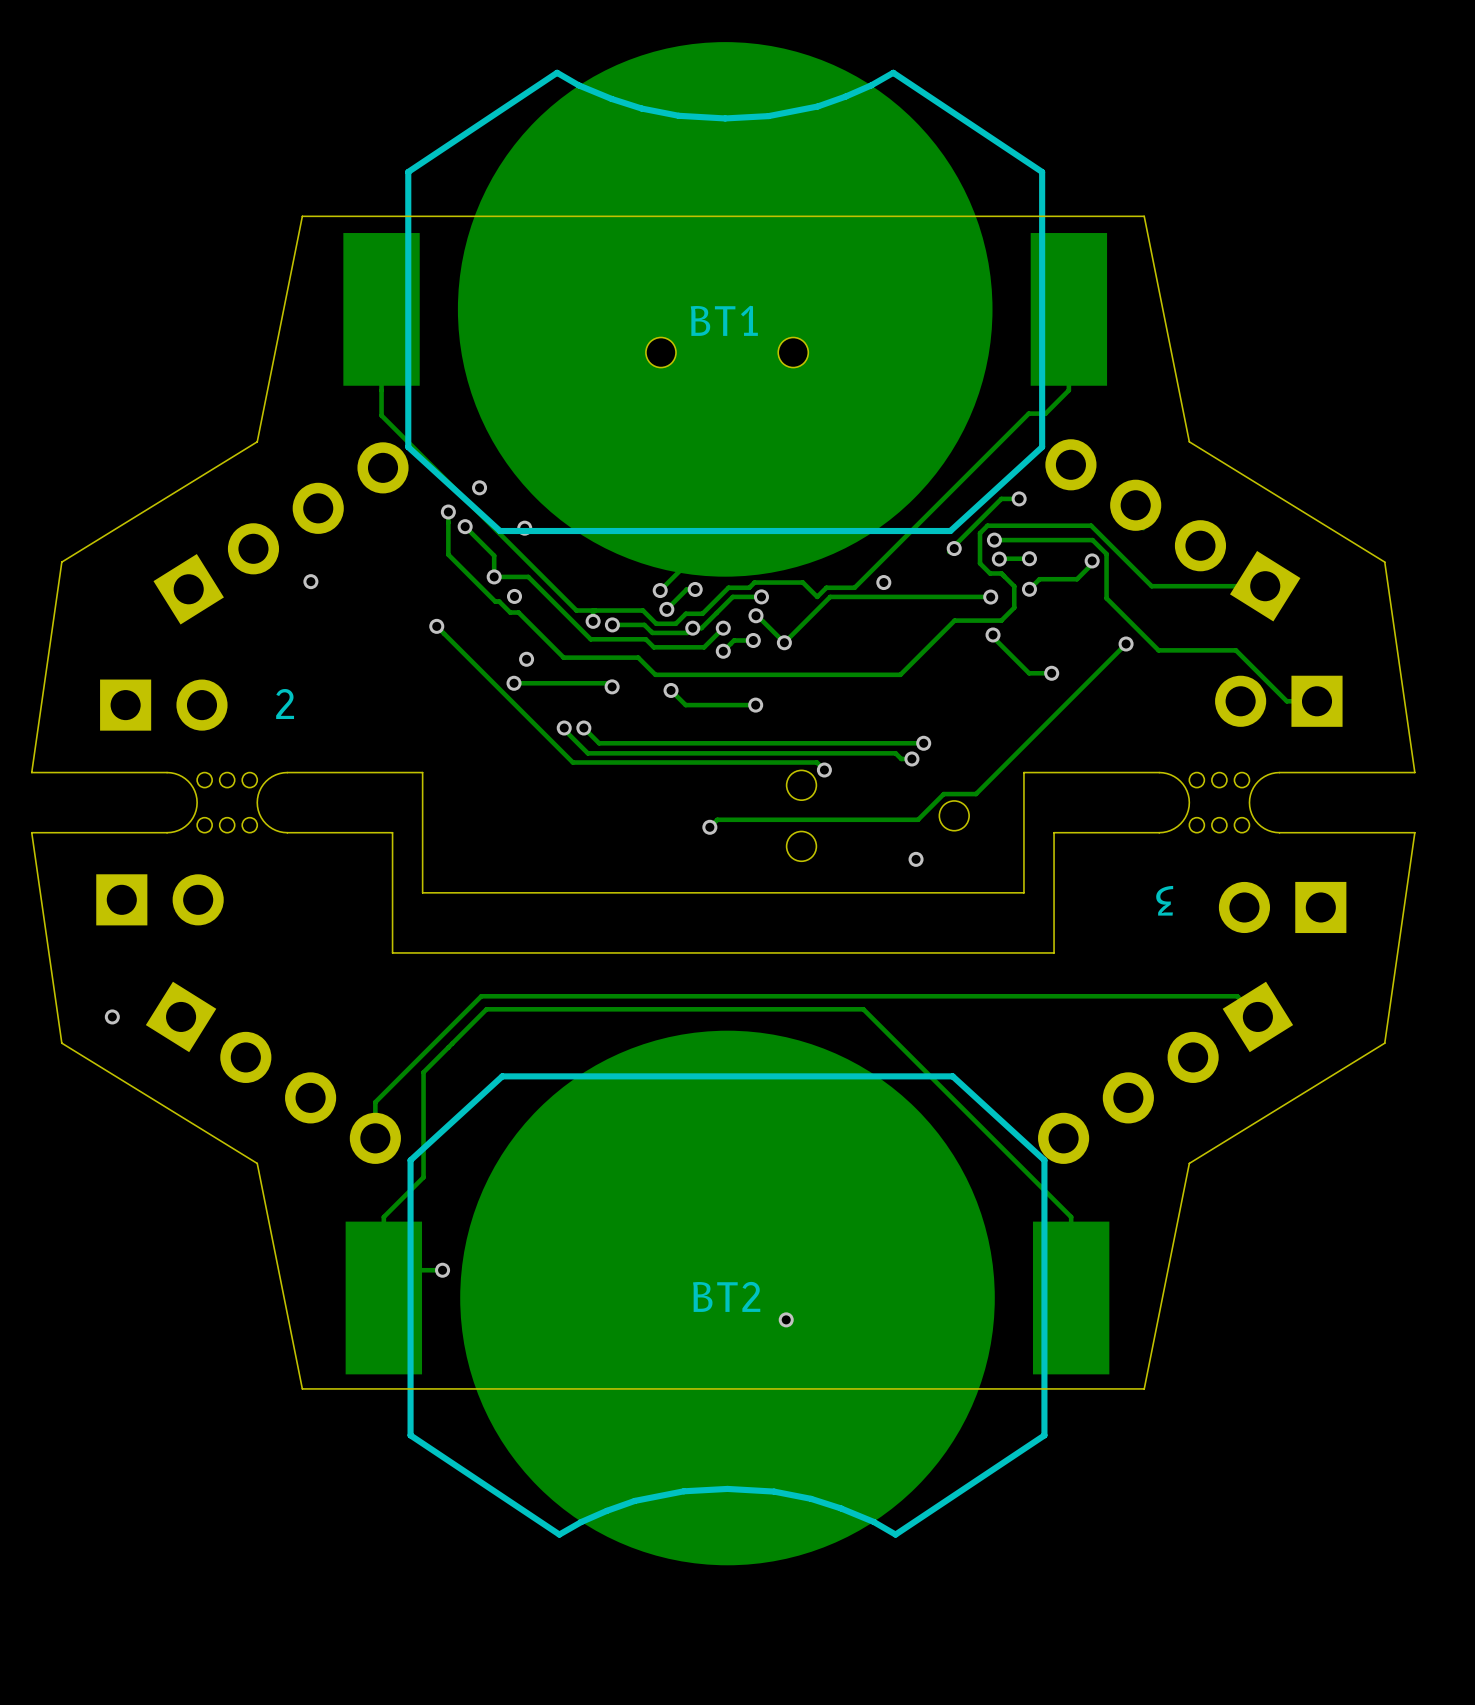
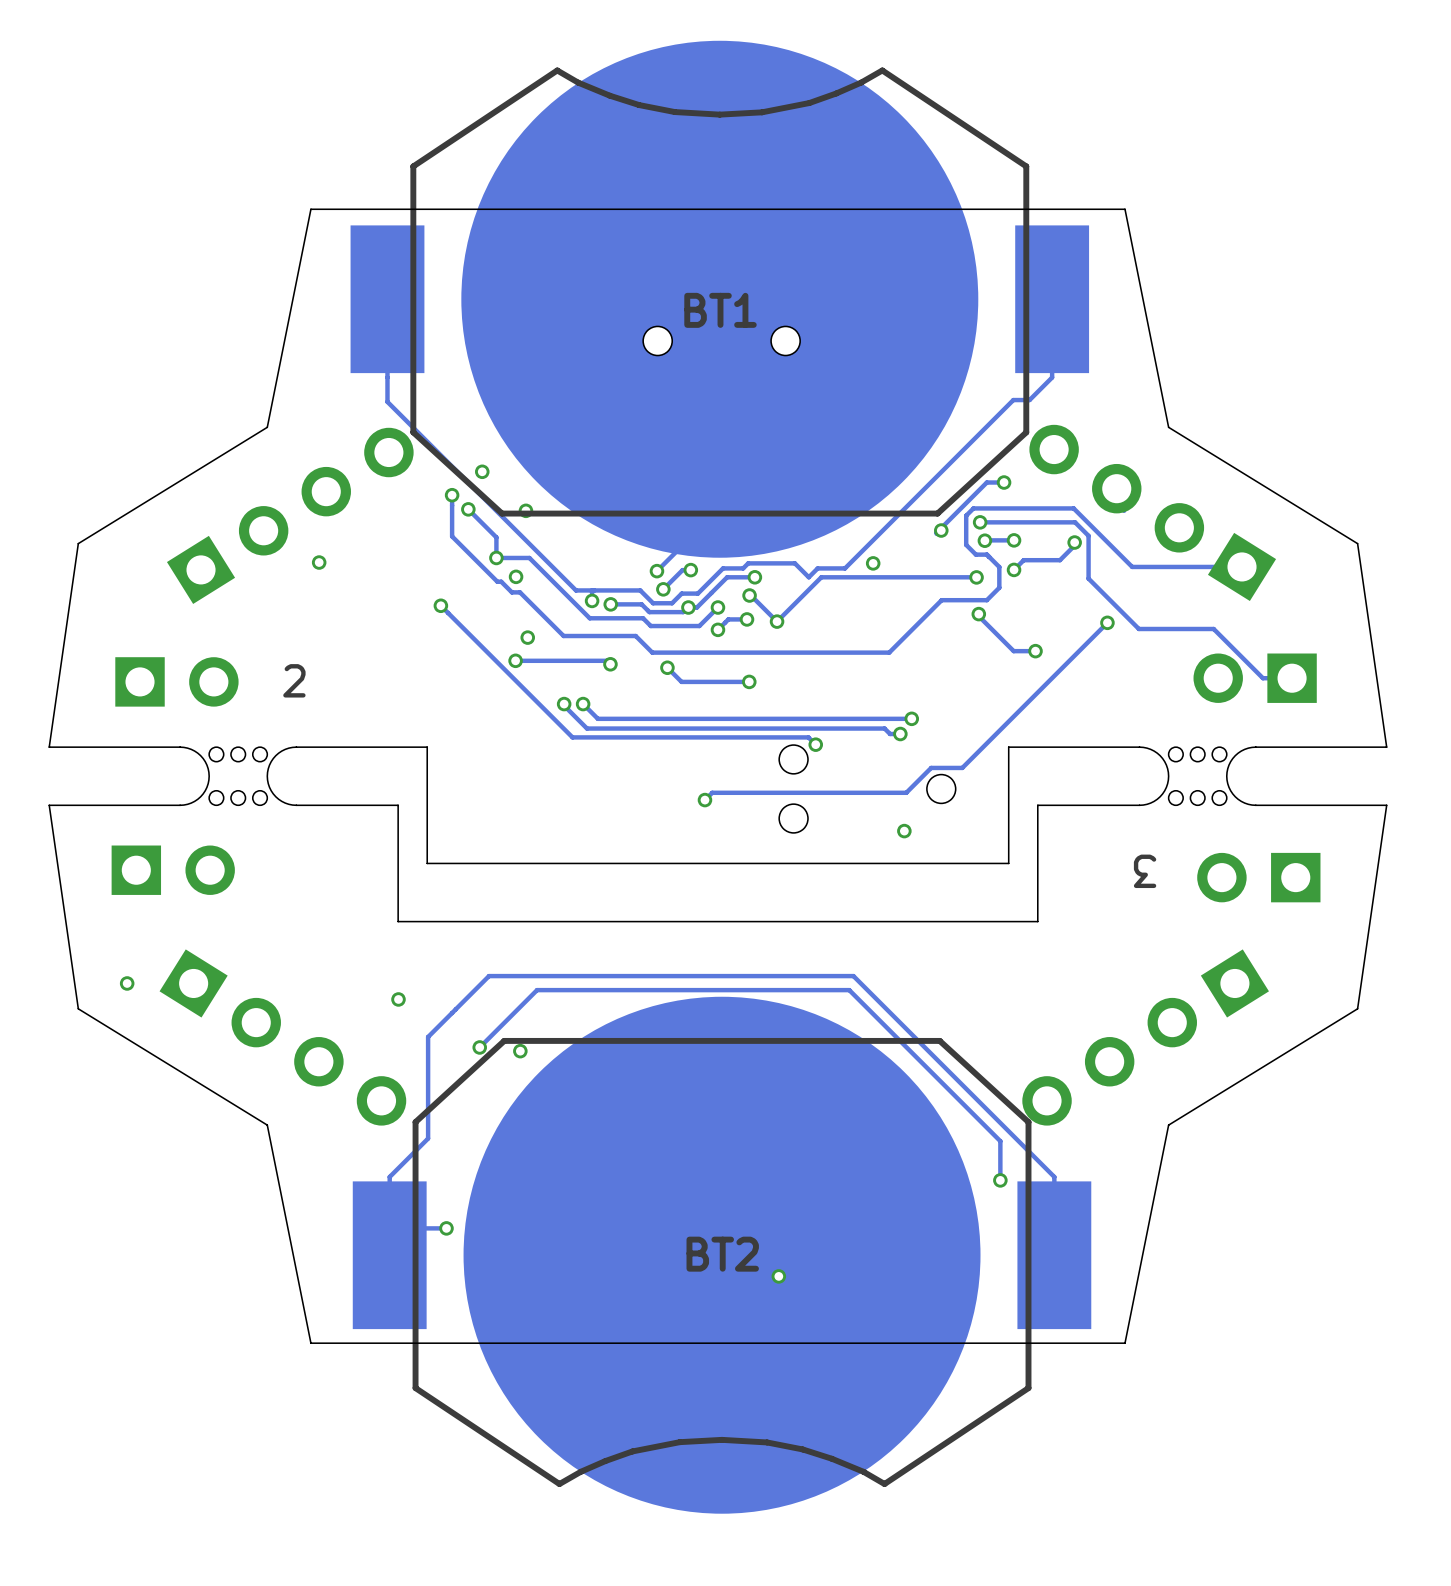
track: (1257, 1016) (1237, 996) (481, 996) (375, 1102) (375, 1138) -> none
via: none -> (398, 999)
track: none -> (479, 1047) (537, 990) (849, 990) (1000, 1141) (1000, 1180)
via: none -> (479, 1047)
via: none -> (520, 1051)
via: none -> (1000, 1180)

